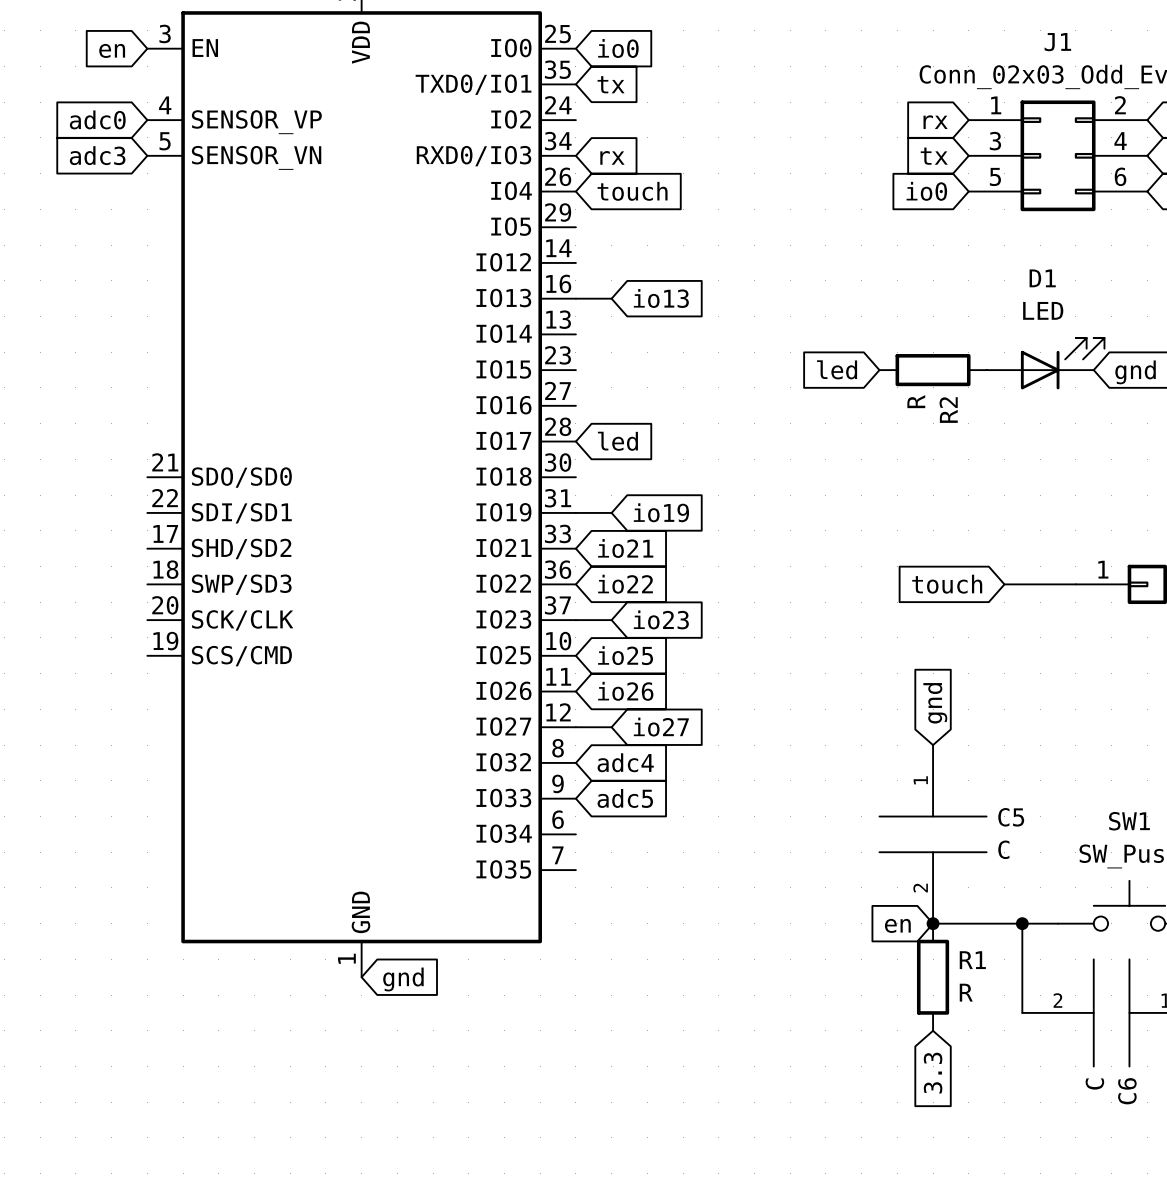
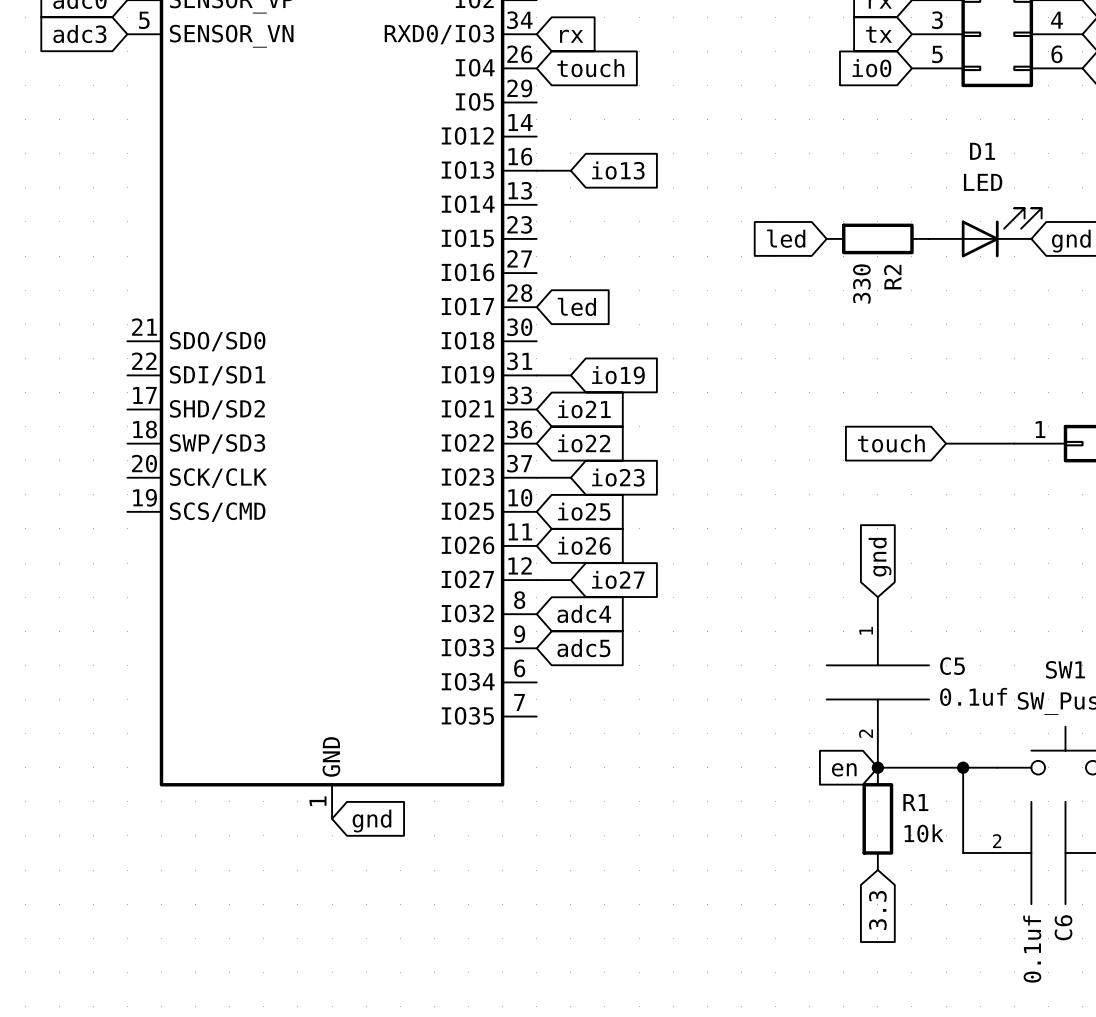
R2 value: R (916, 401) -> 330 (861, 283)
C5 value: C (1003, 849) -> 0.1uf (973, 696)
R1 value: R (966, 992) -> 10k (924, 833)
C6 value: C (1094, 1084) -> 0.1uf (1032, 949)

